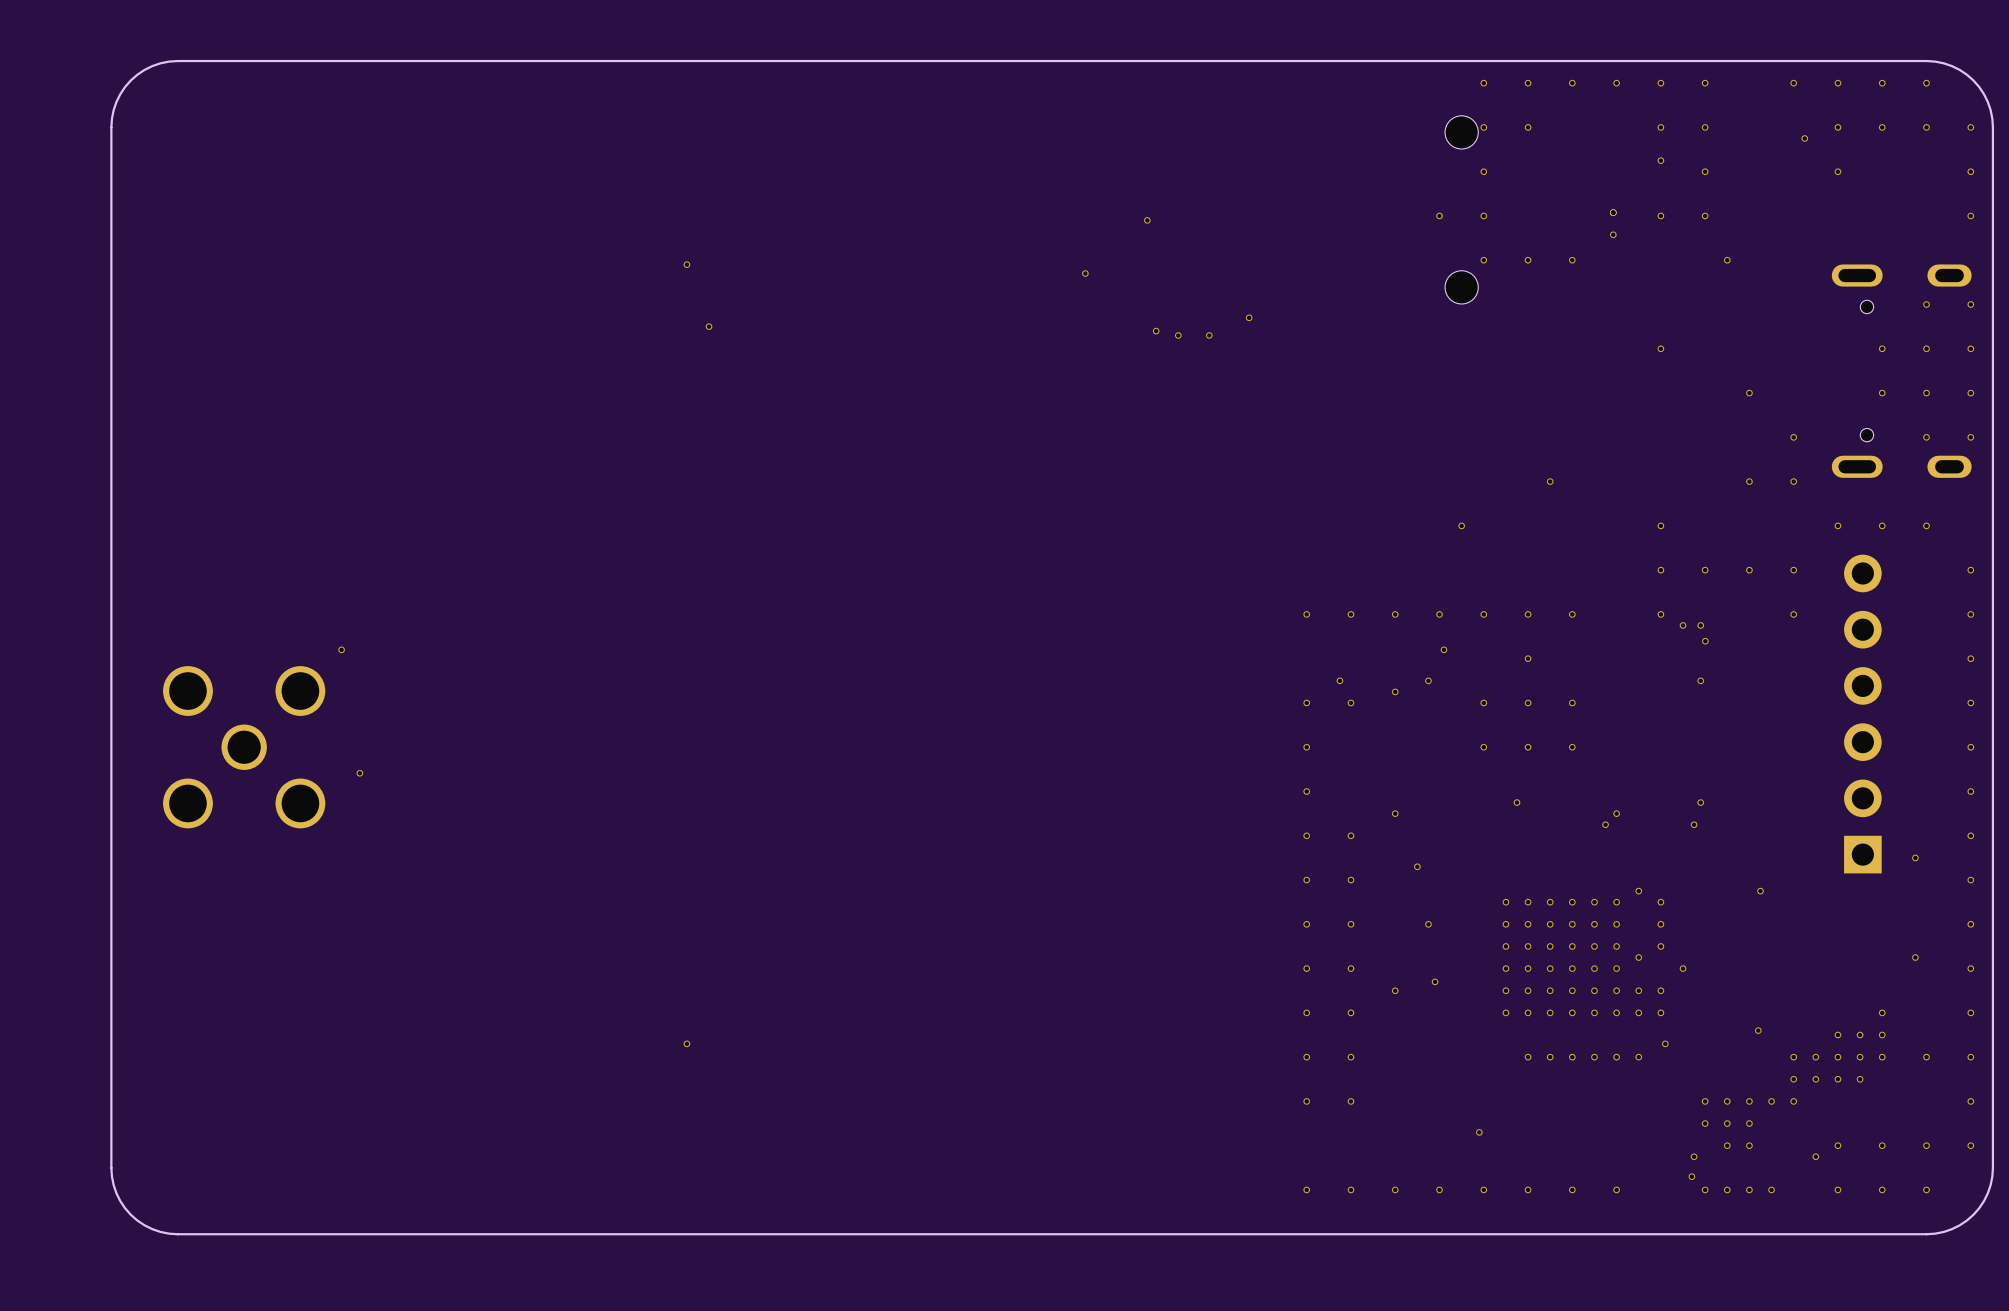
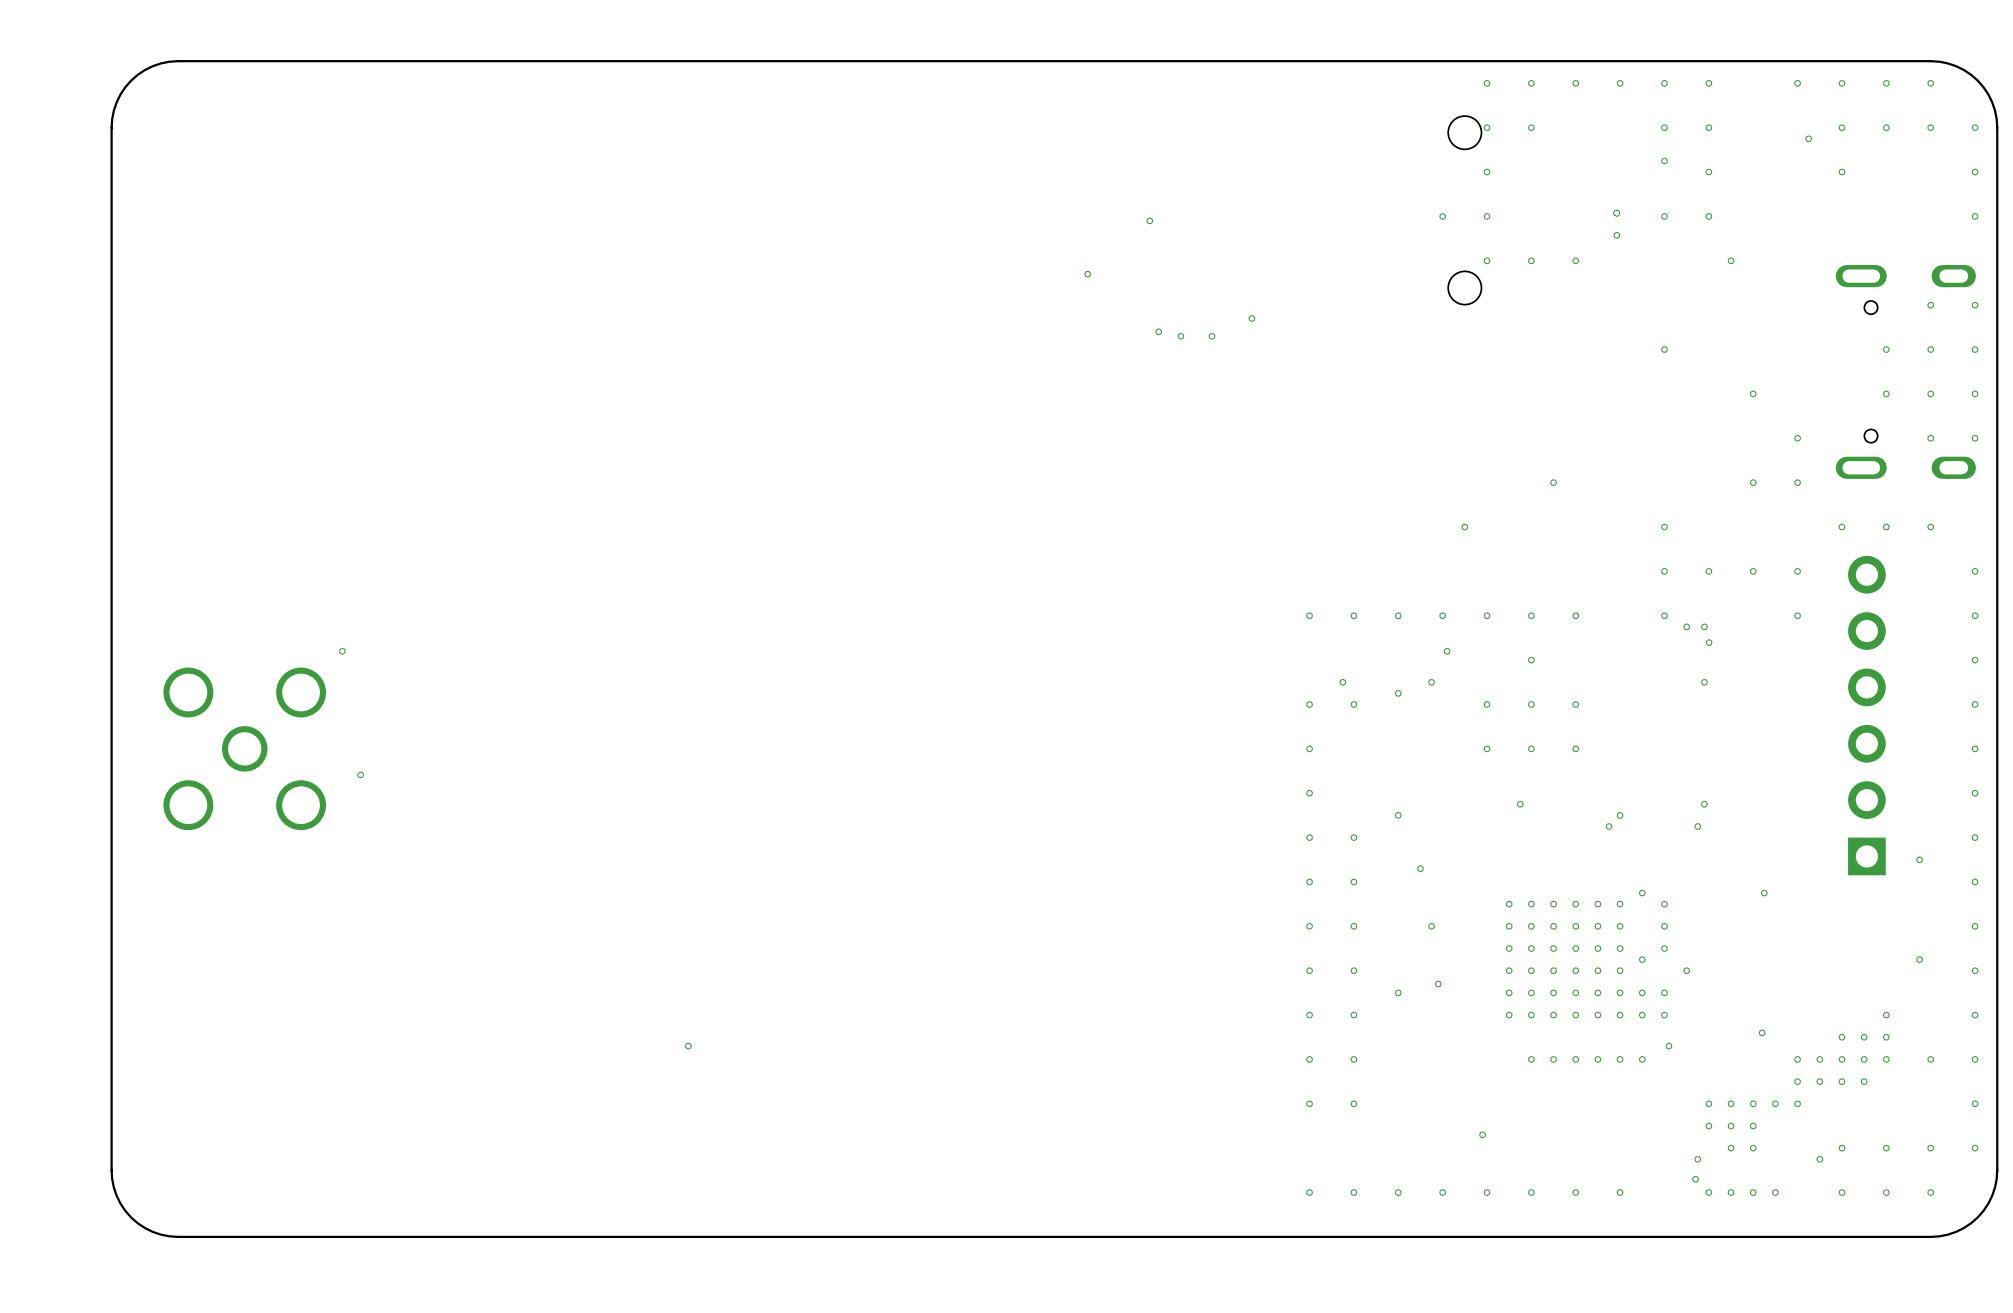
via: (686, 264) -> none
via: (709, 326) -> none

